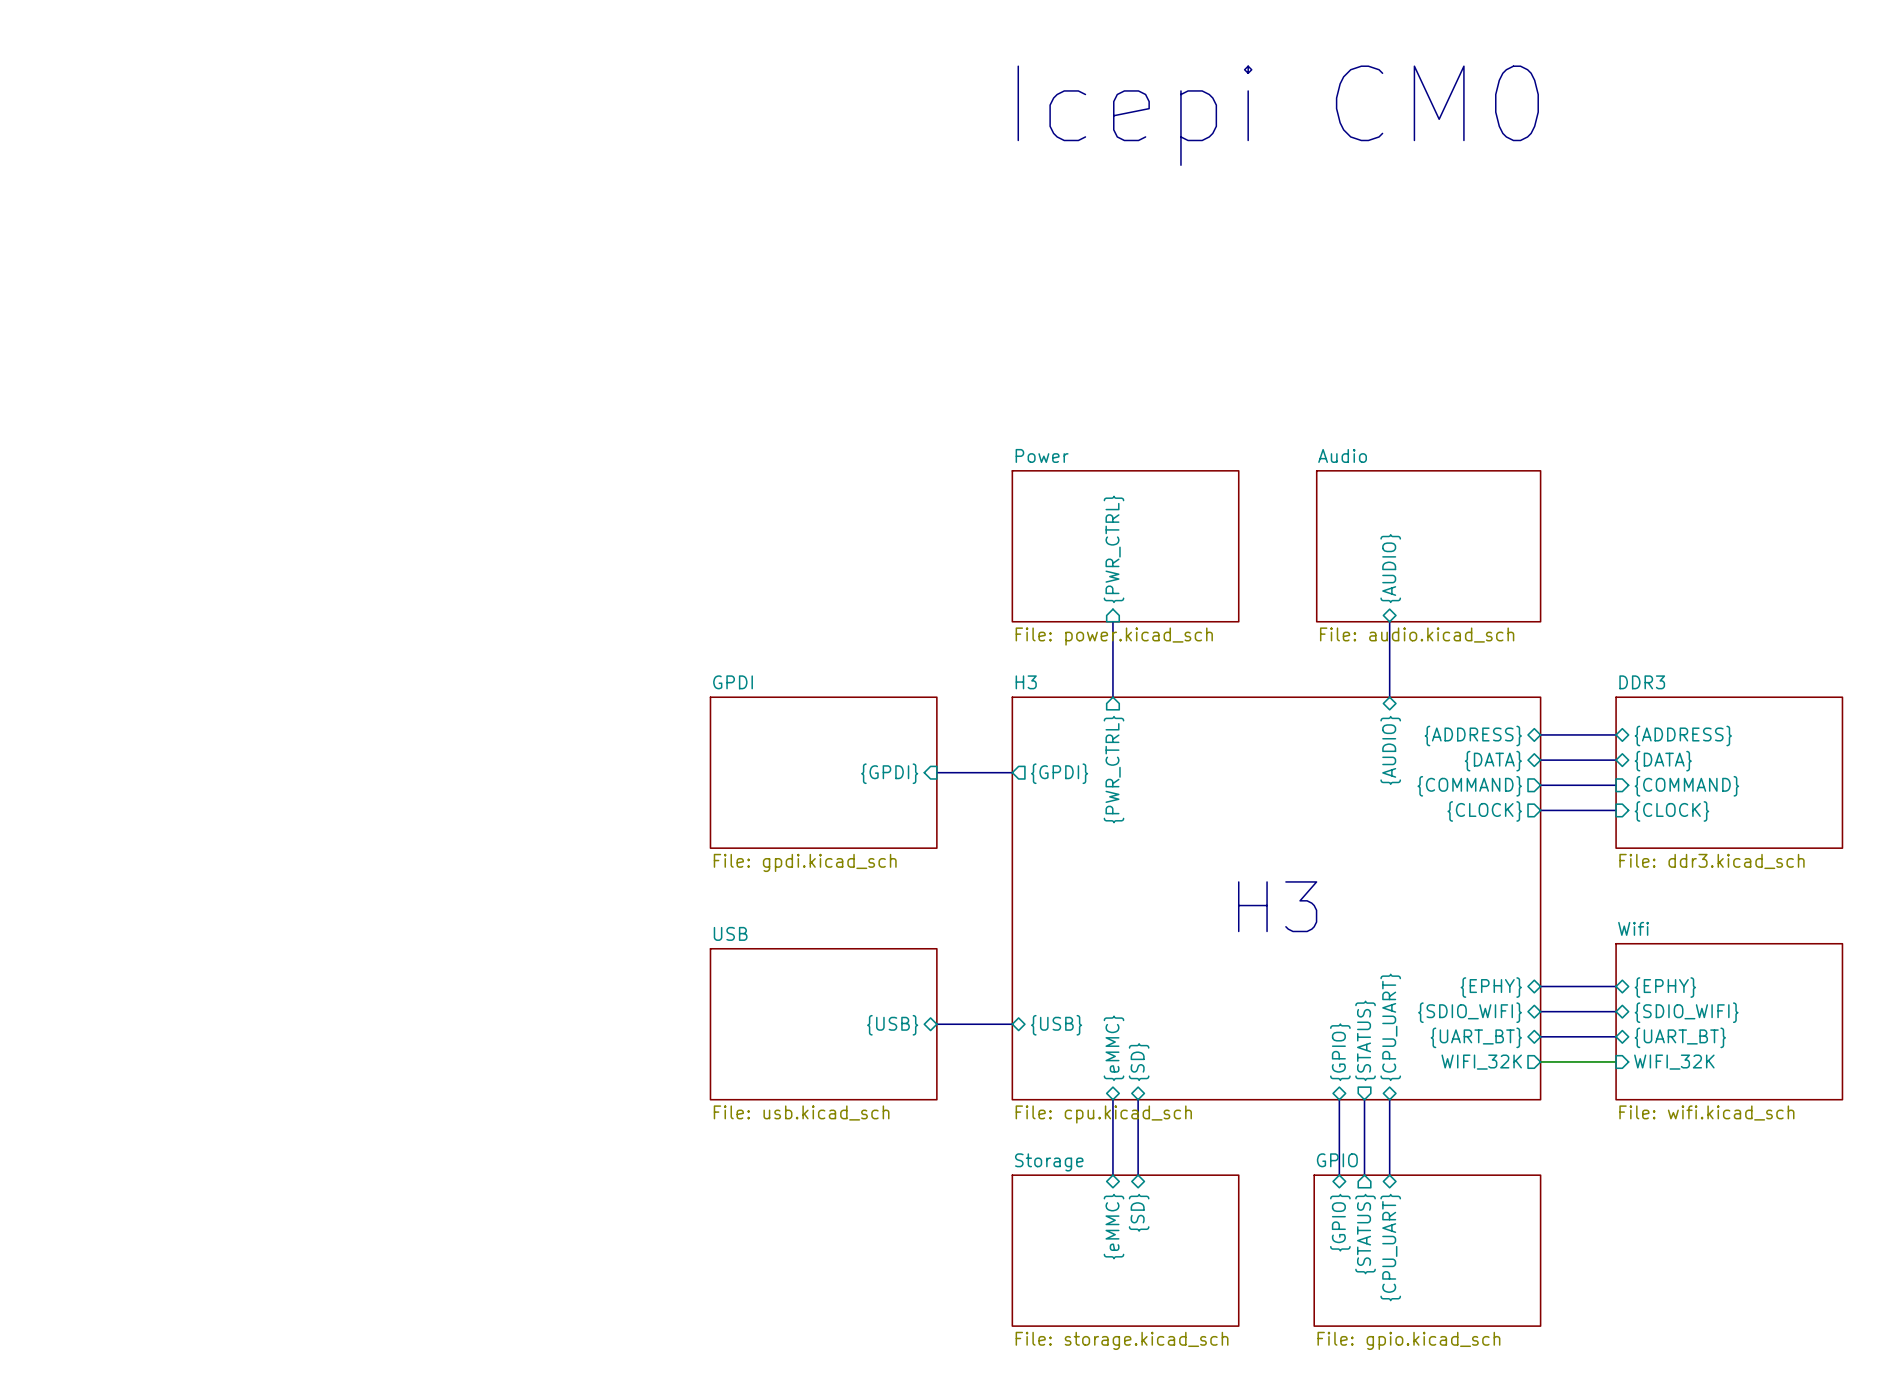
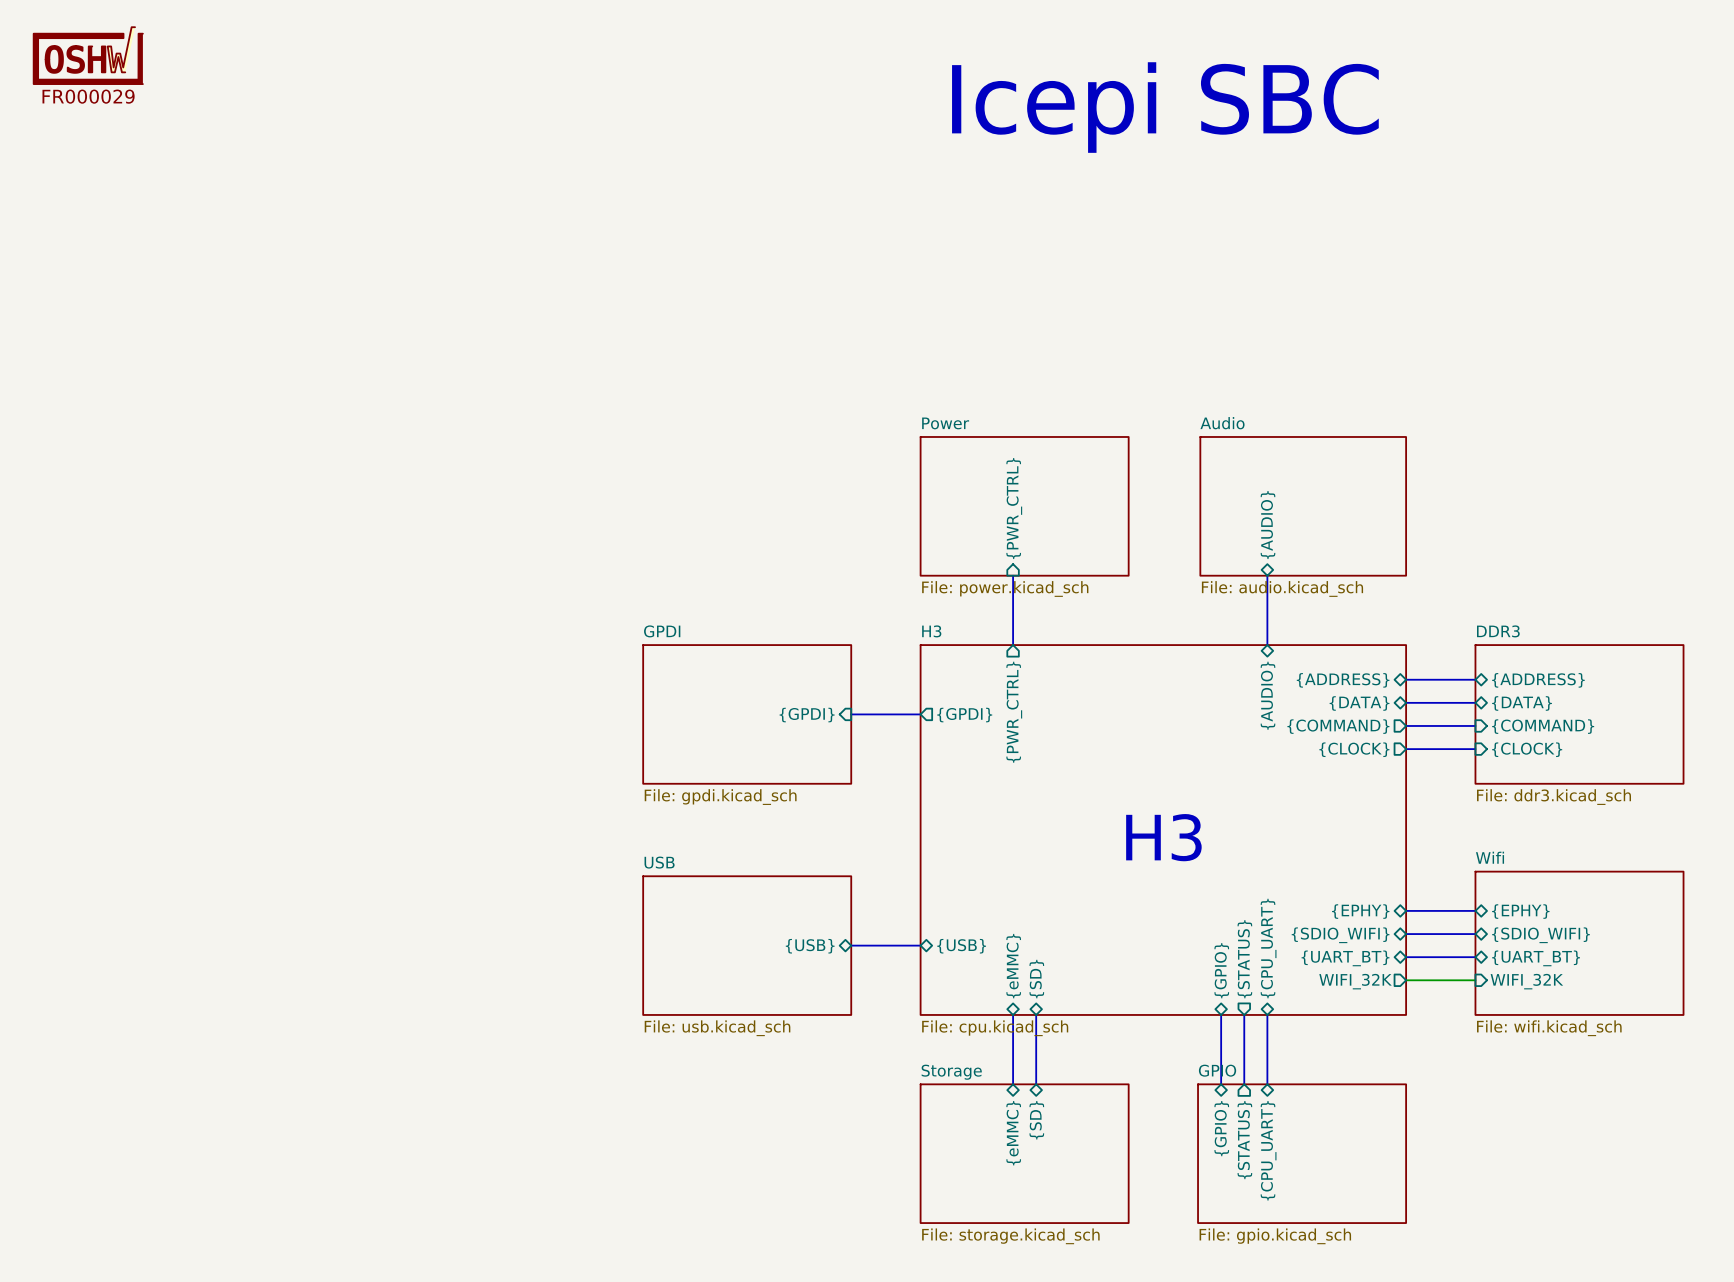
part: none -> (88, 55)
text: Icepi CM0 (1278, 115) -> Icepi SBC (1165, 107)

